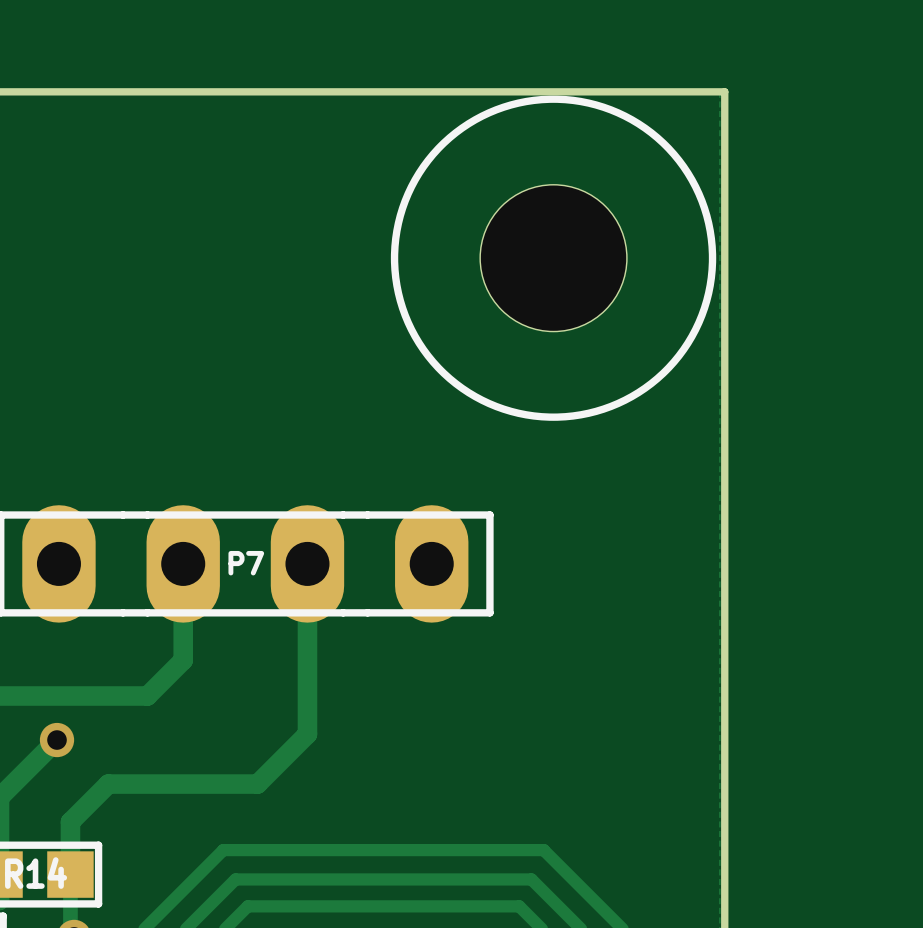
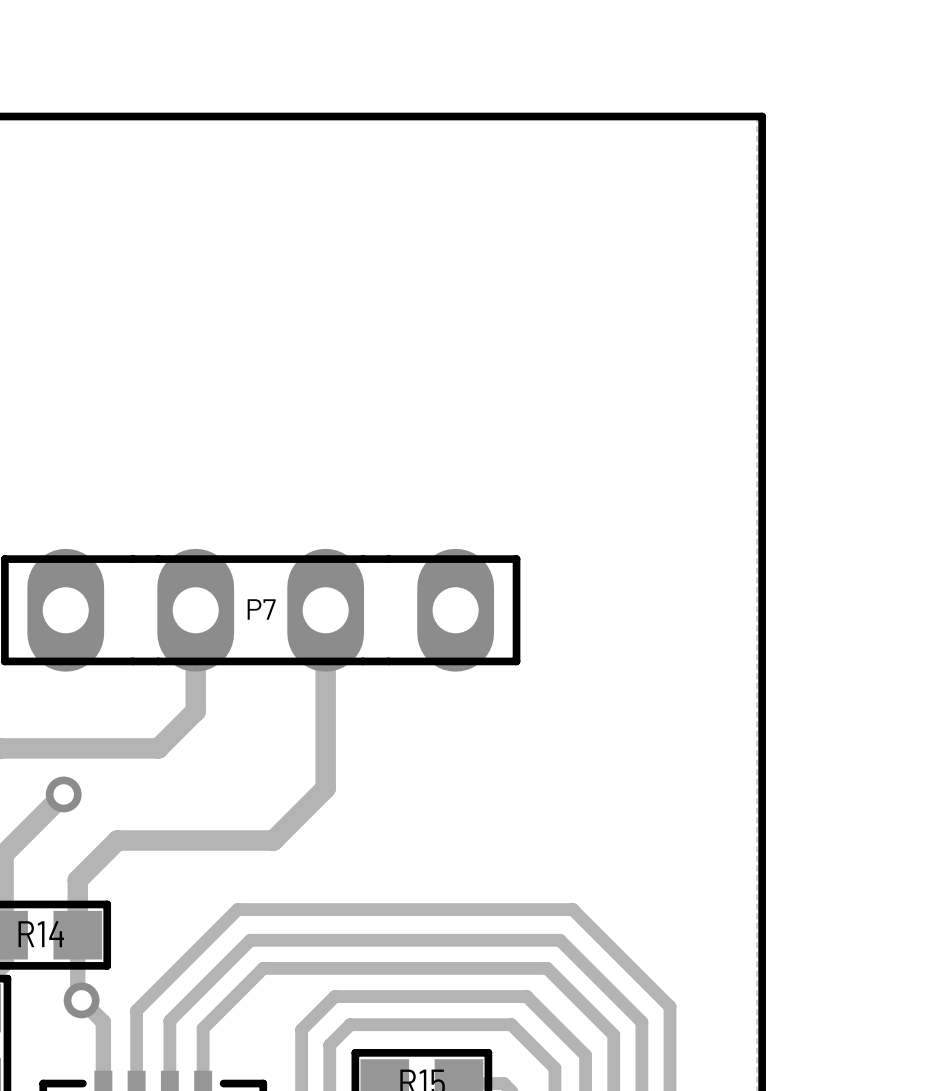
part: (553, 258) -> none

